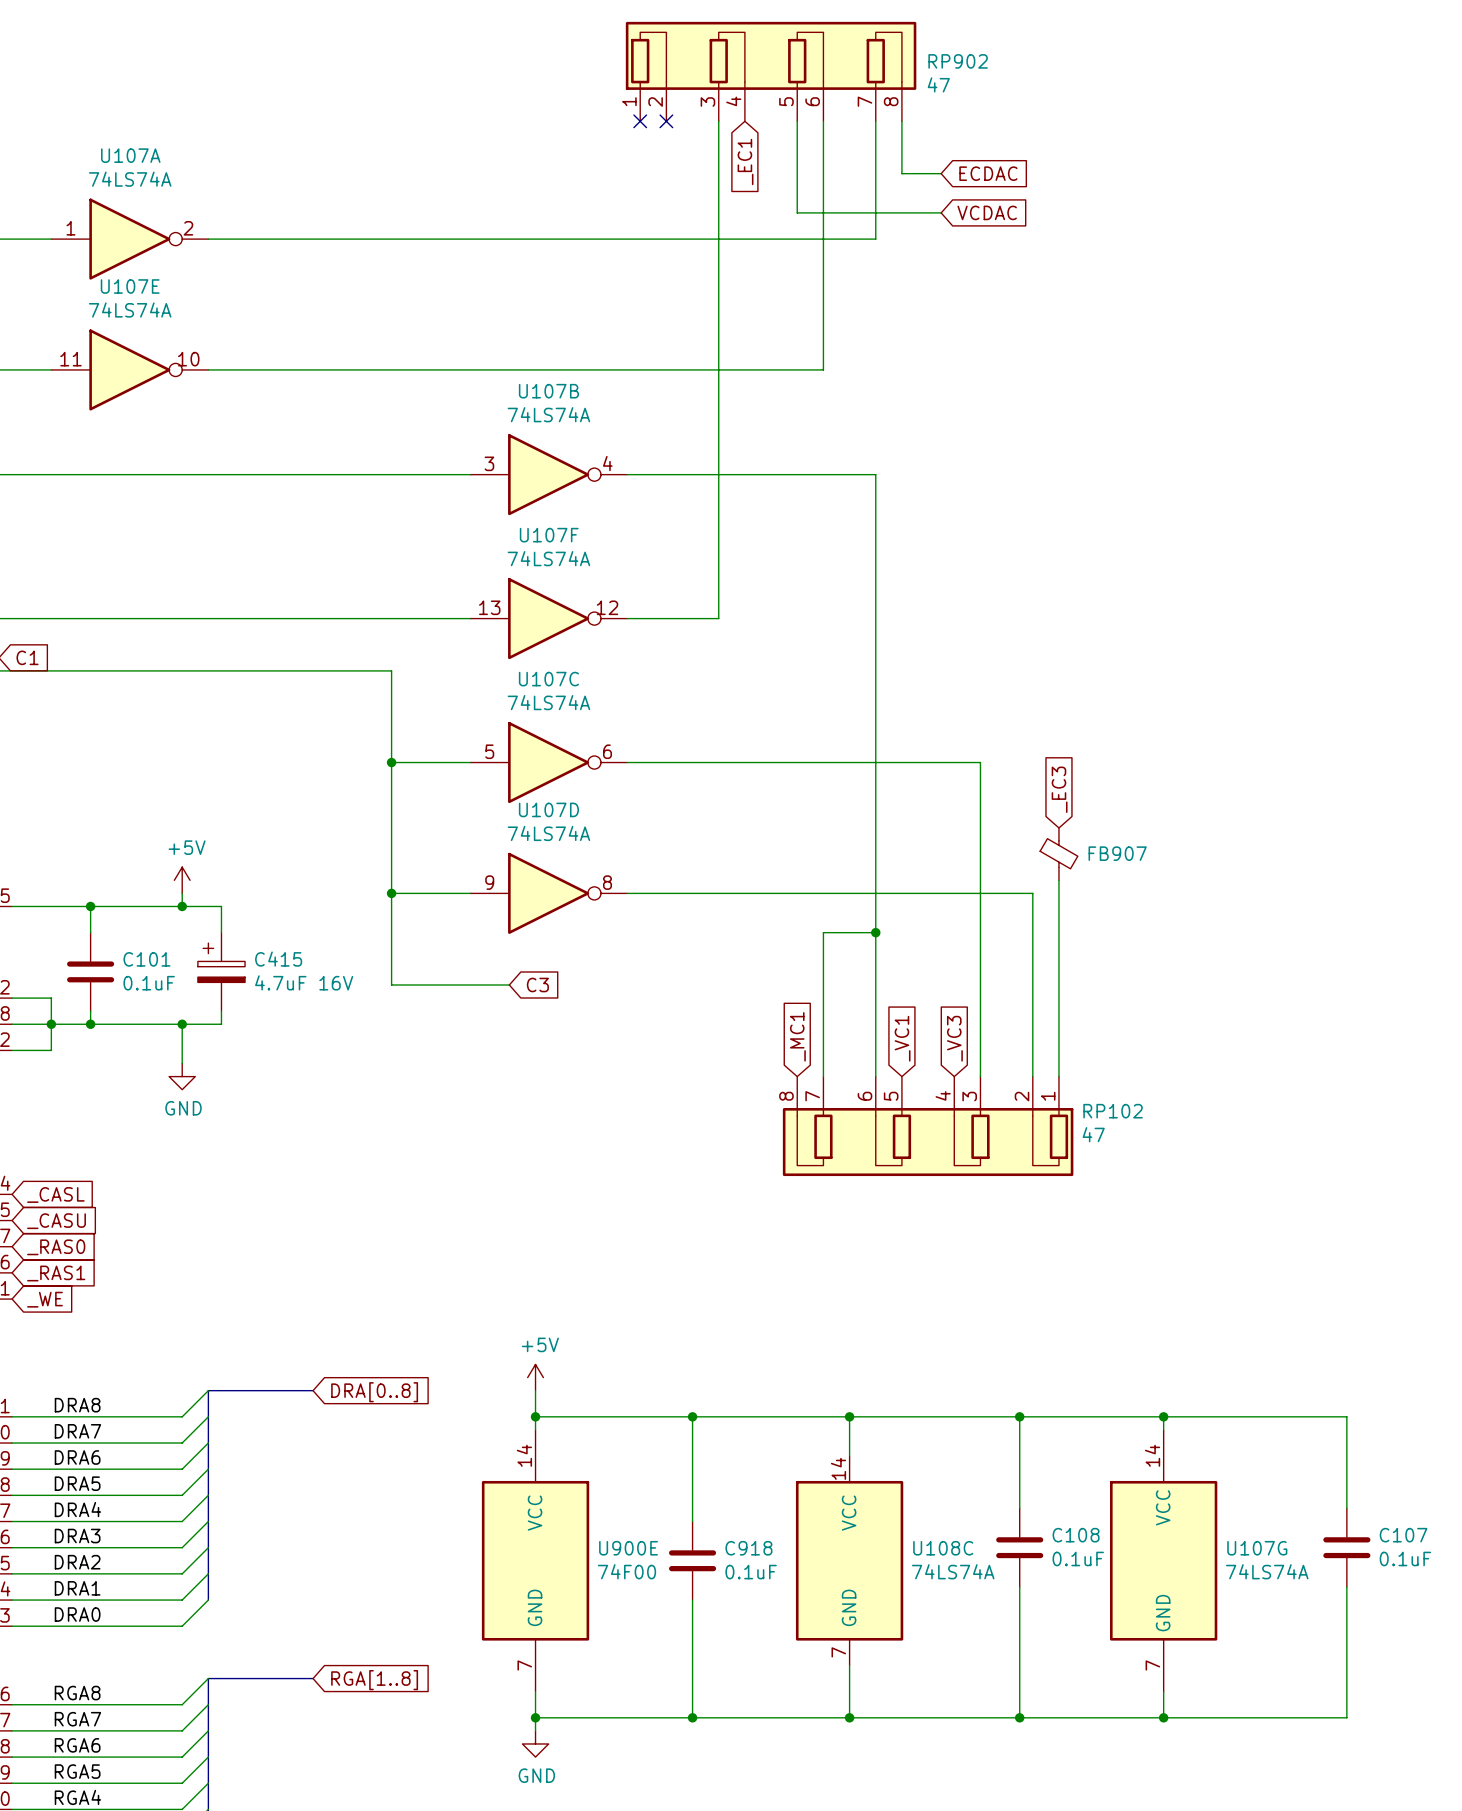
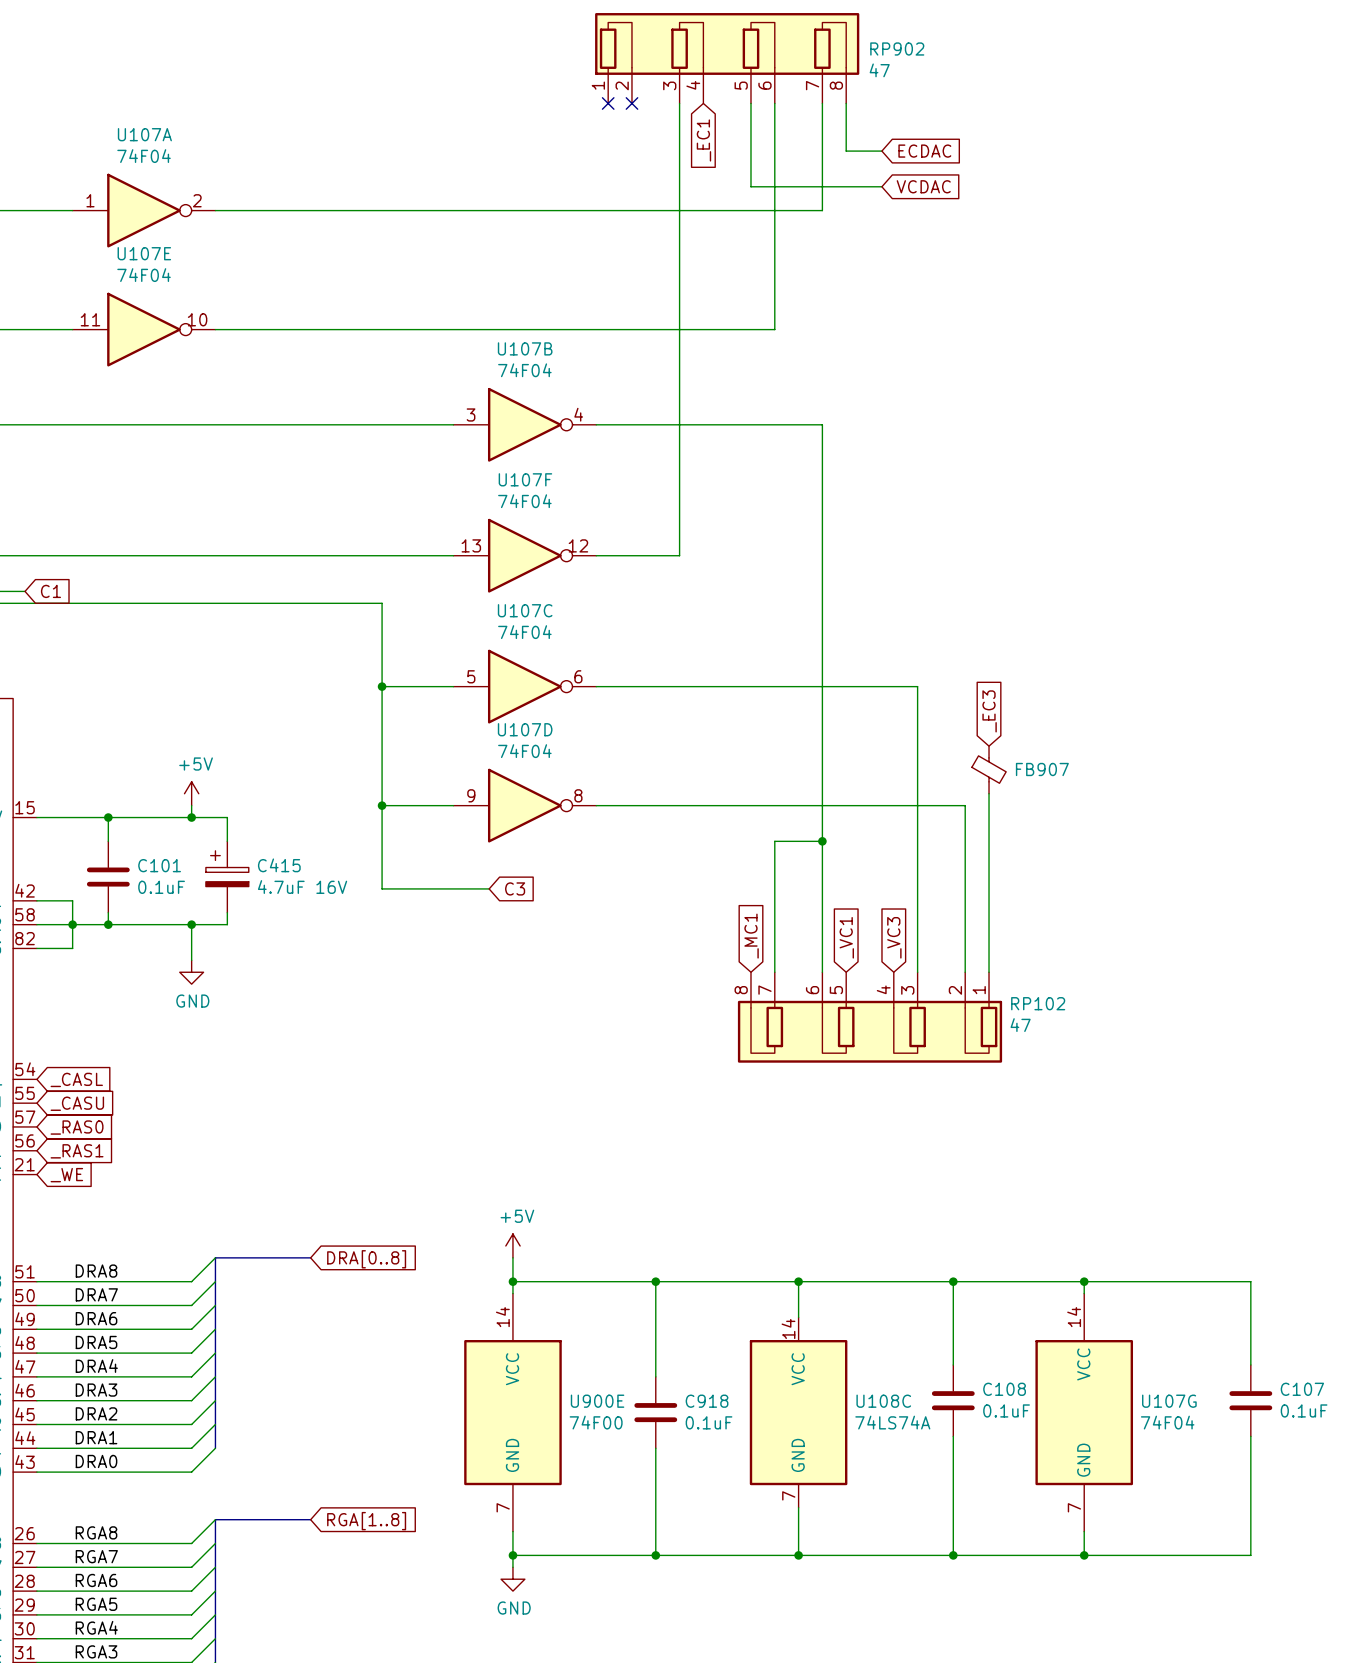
U107A value: 74LS74A (130, 179) -> 74F04 (144, 156)
U107E value: 74LS74A (130, 310) -> 74F04 (144, 275)
U107B value: 74LS74A (548, 414) -> 74F04 (524, 370)
U107F value: 74LS74A (548, 558) -> 74F04 (524, 501)
U107C value: 74LS74A (548, 702) -> 74F04 (524, 632)
U107D value: 74LS74A (548, 833) -> 74F04 (524, 751)
U107G value: 74LS74A (1267, 1571) -> 74F04 (1167, 1422)

